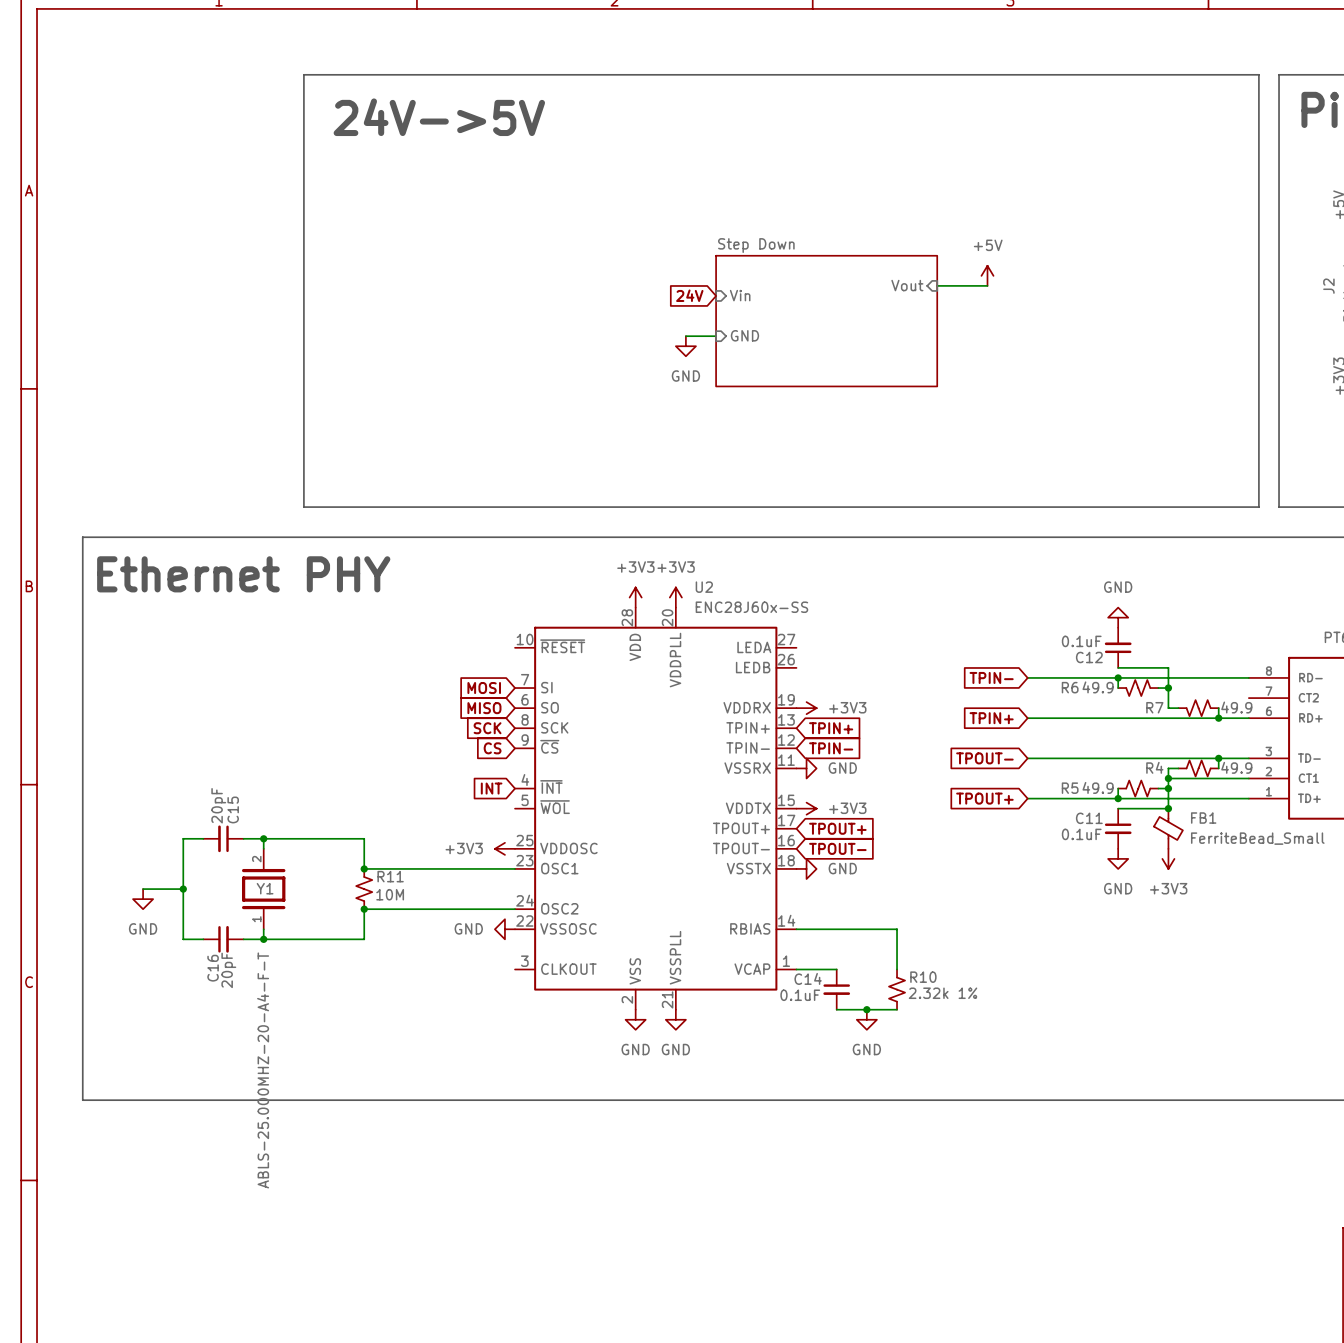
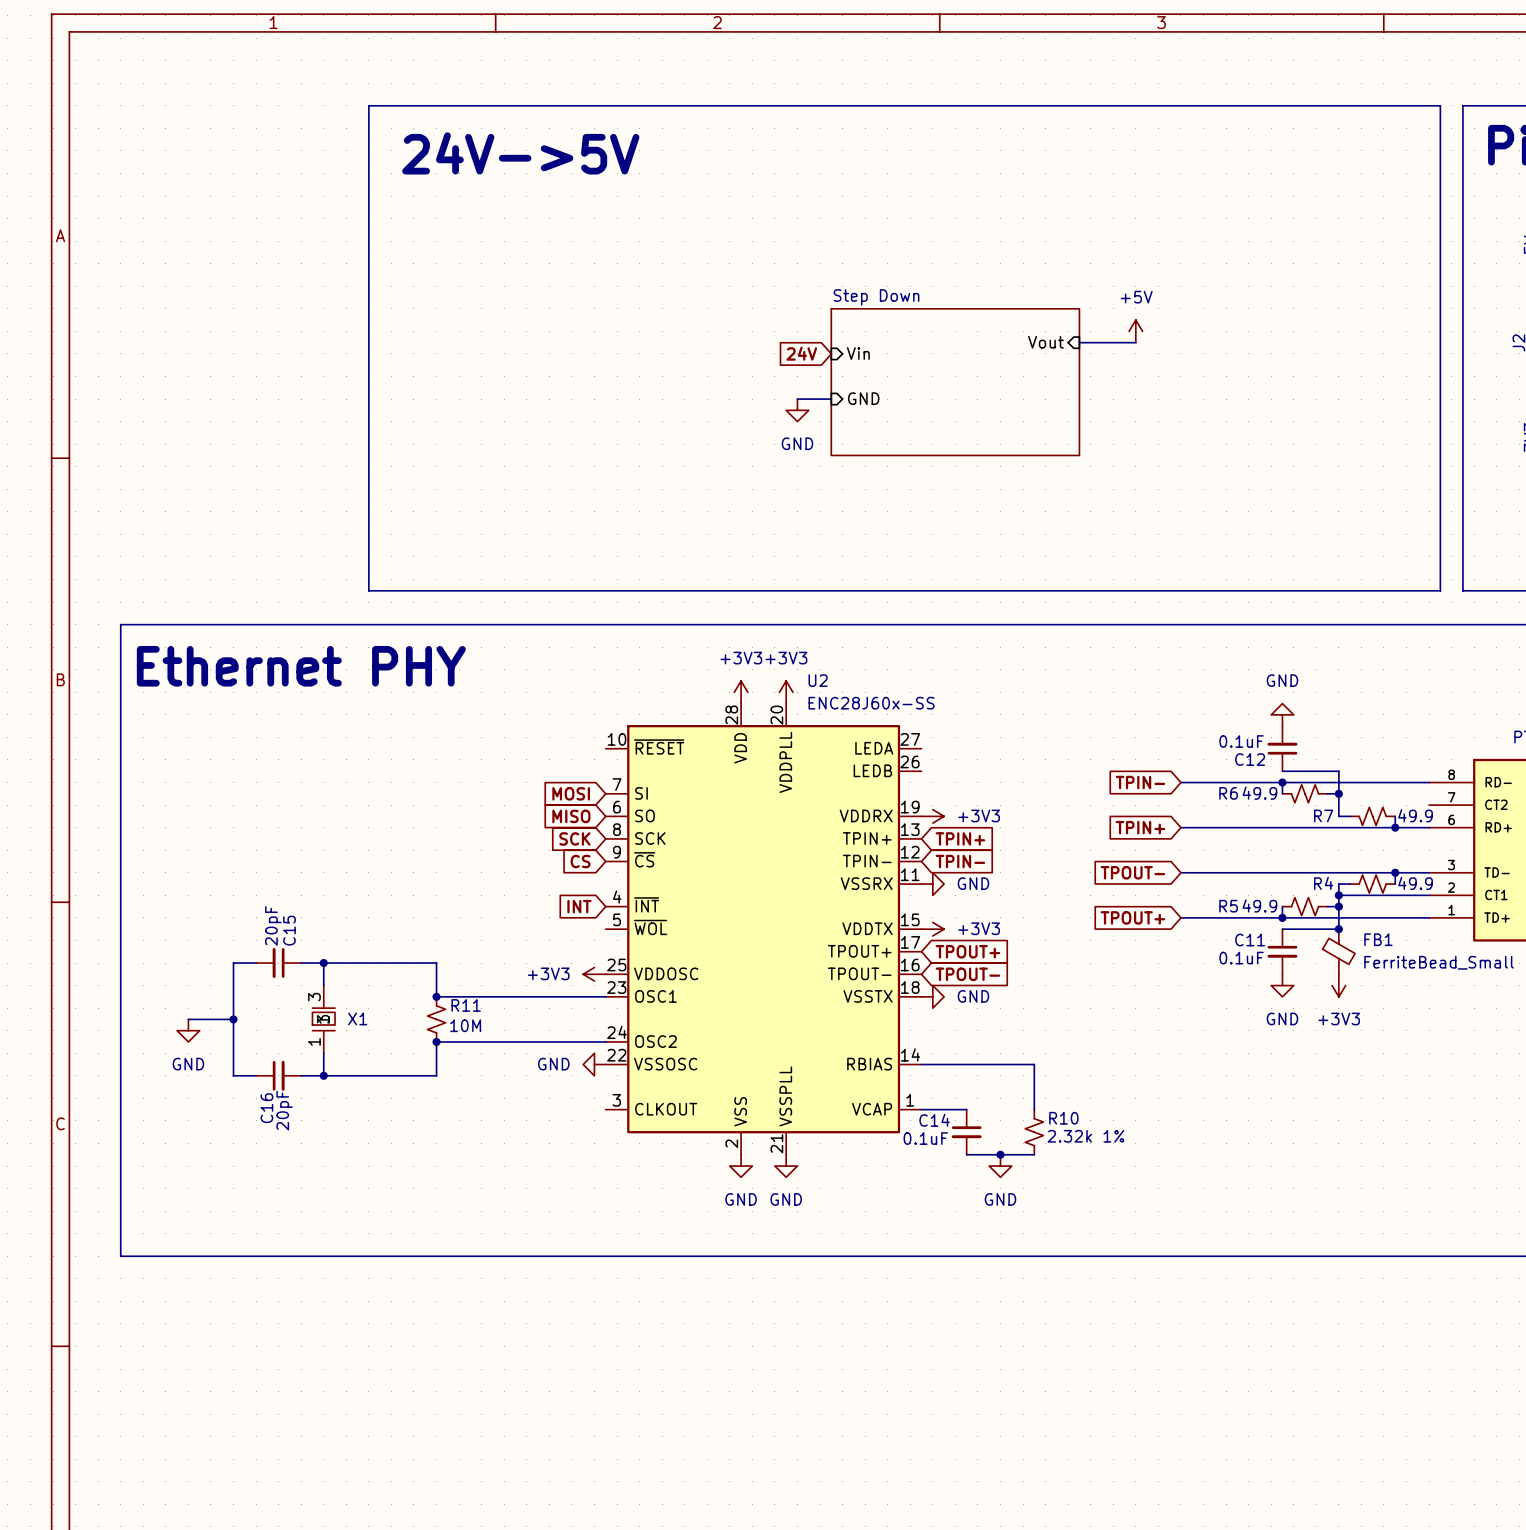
Y1: ABLS-25.000MHZ-20-A4-F-T (263, 889) -> none
X1: none -> (323, 1019)

